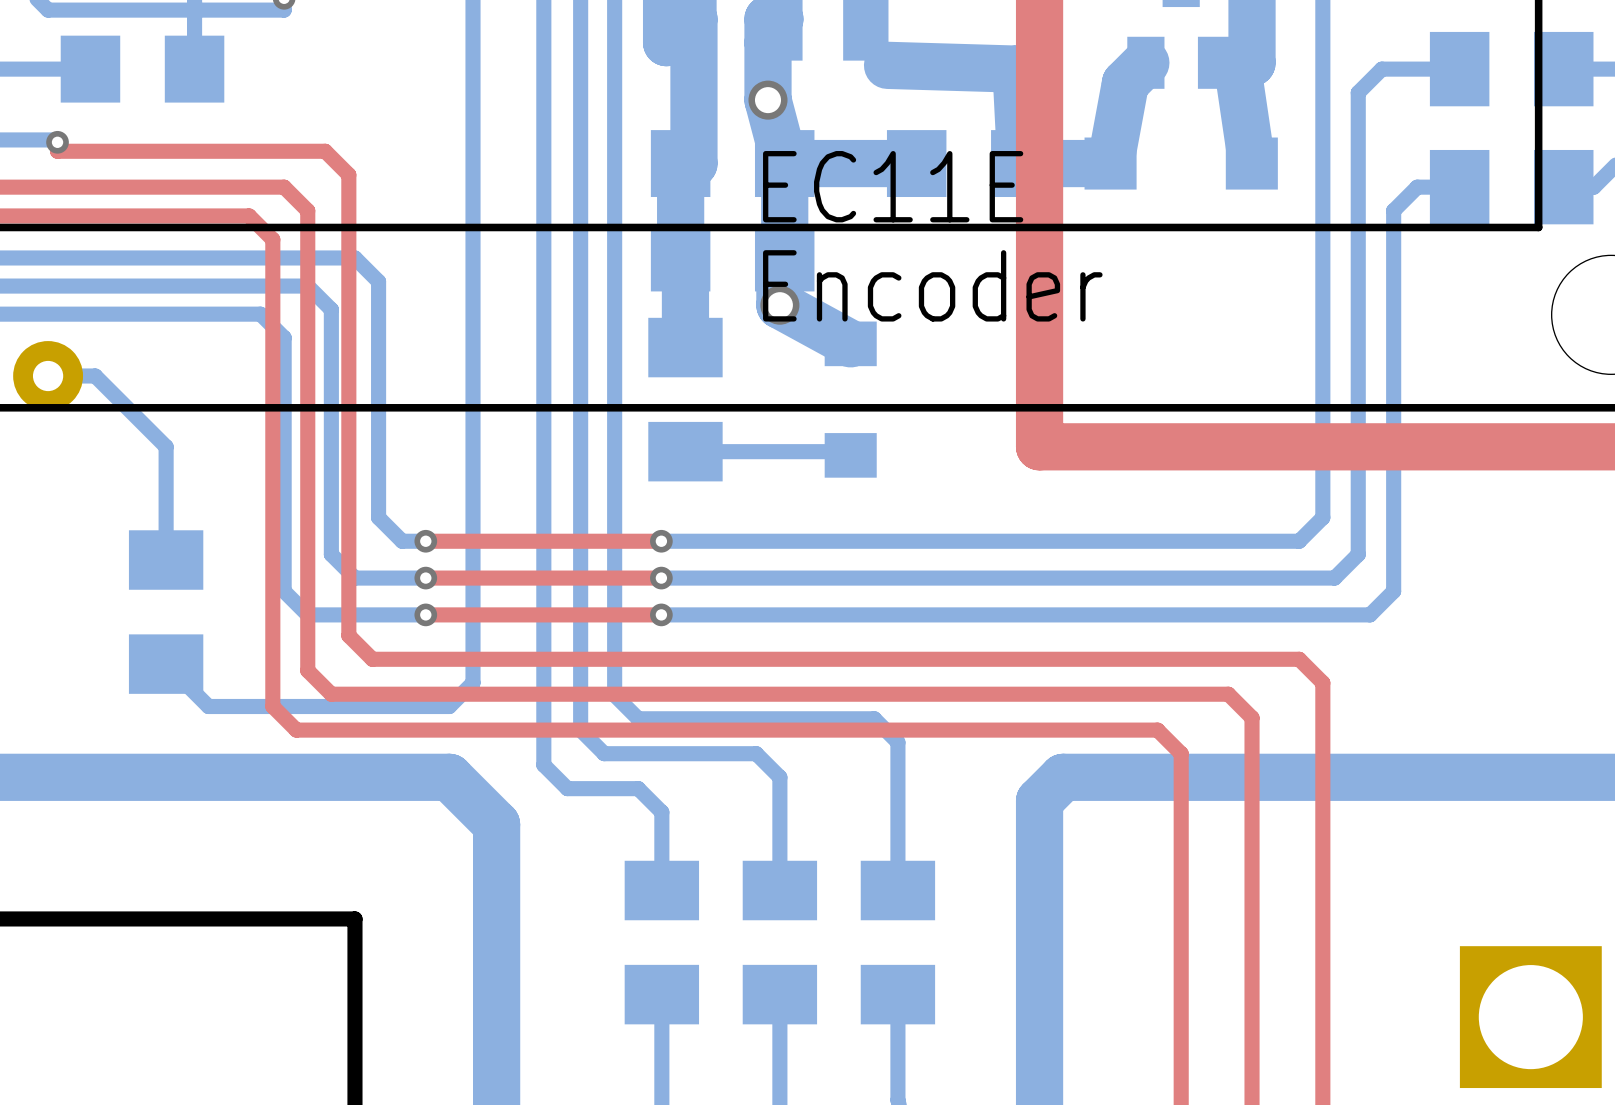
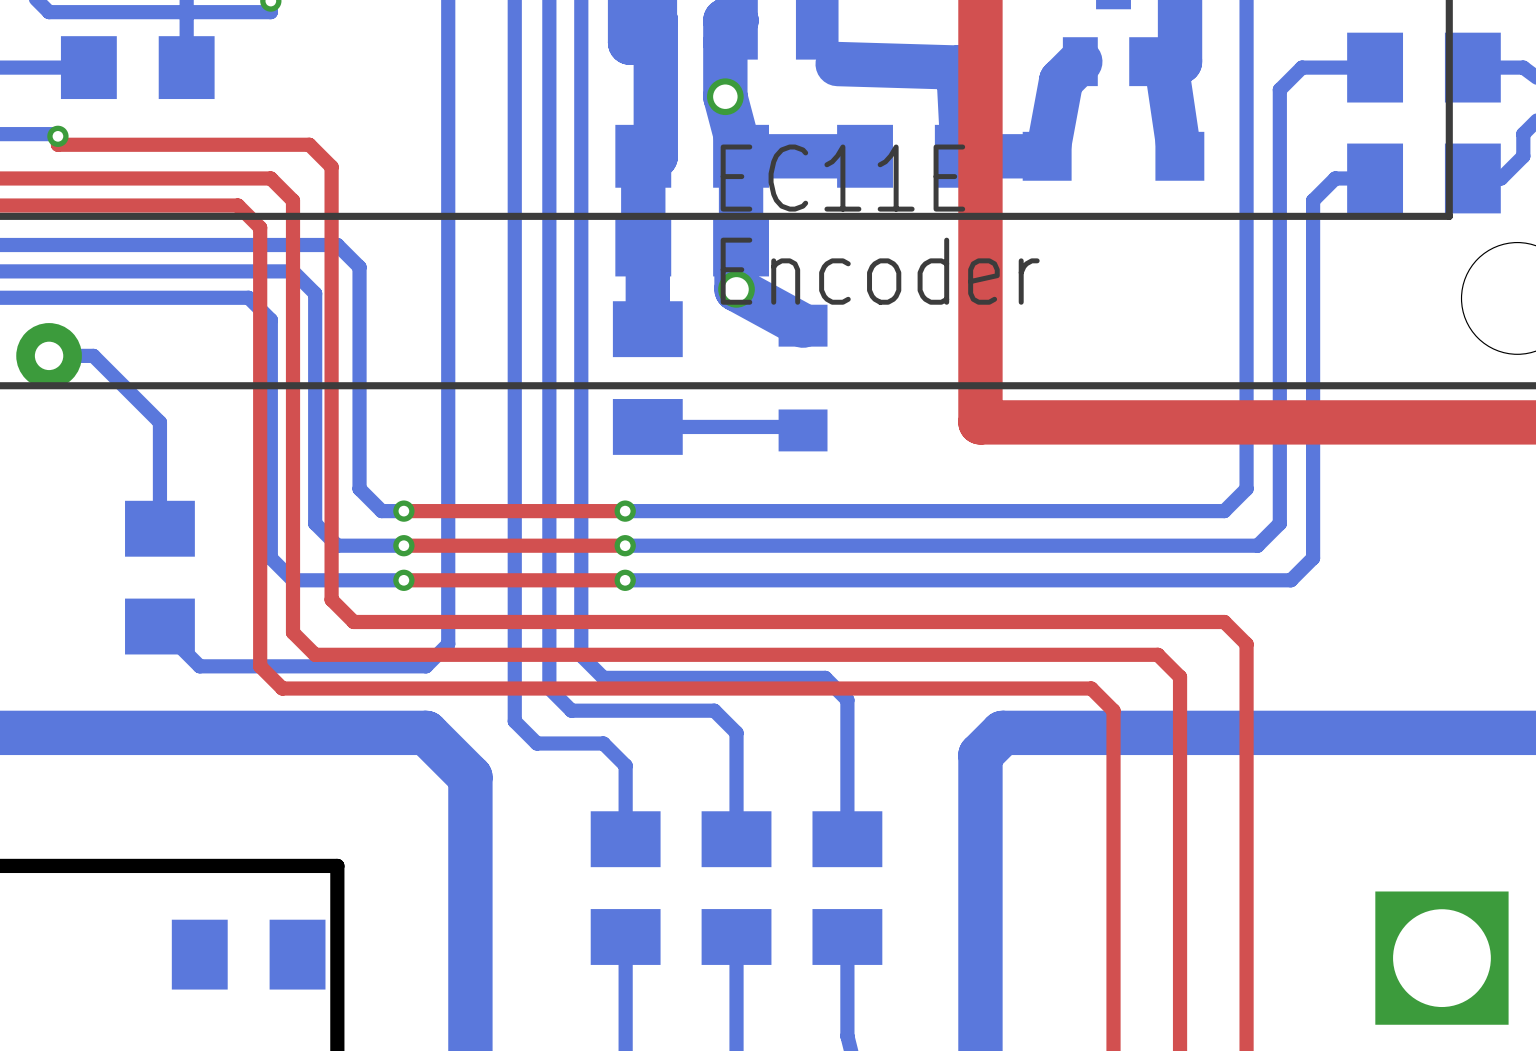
part: none -> (248, 954)

